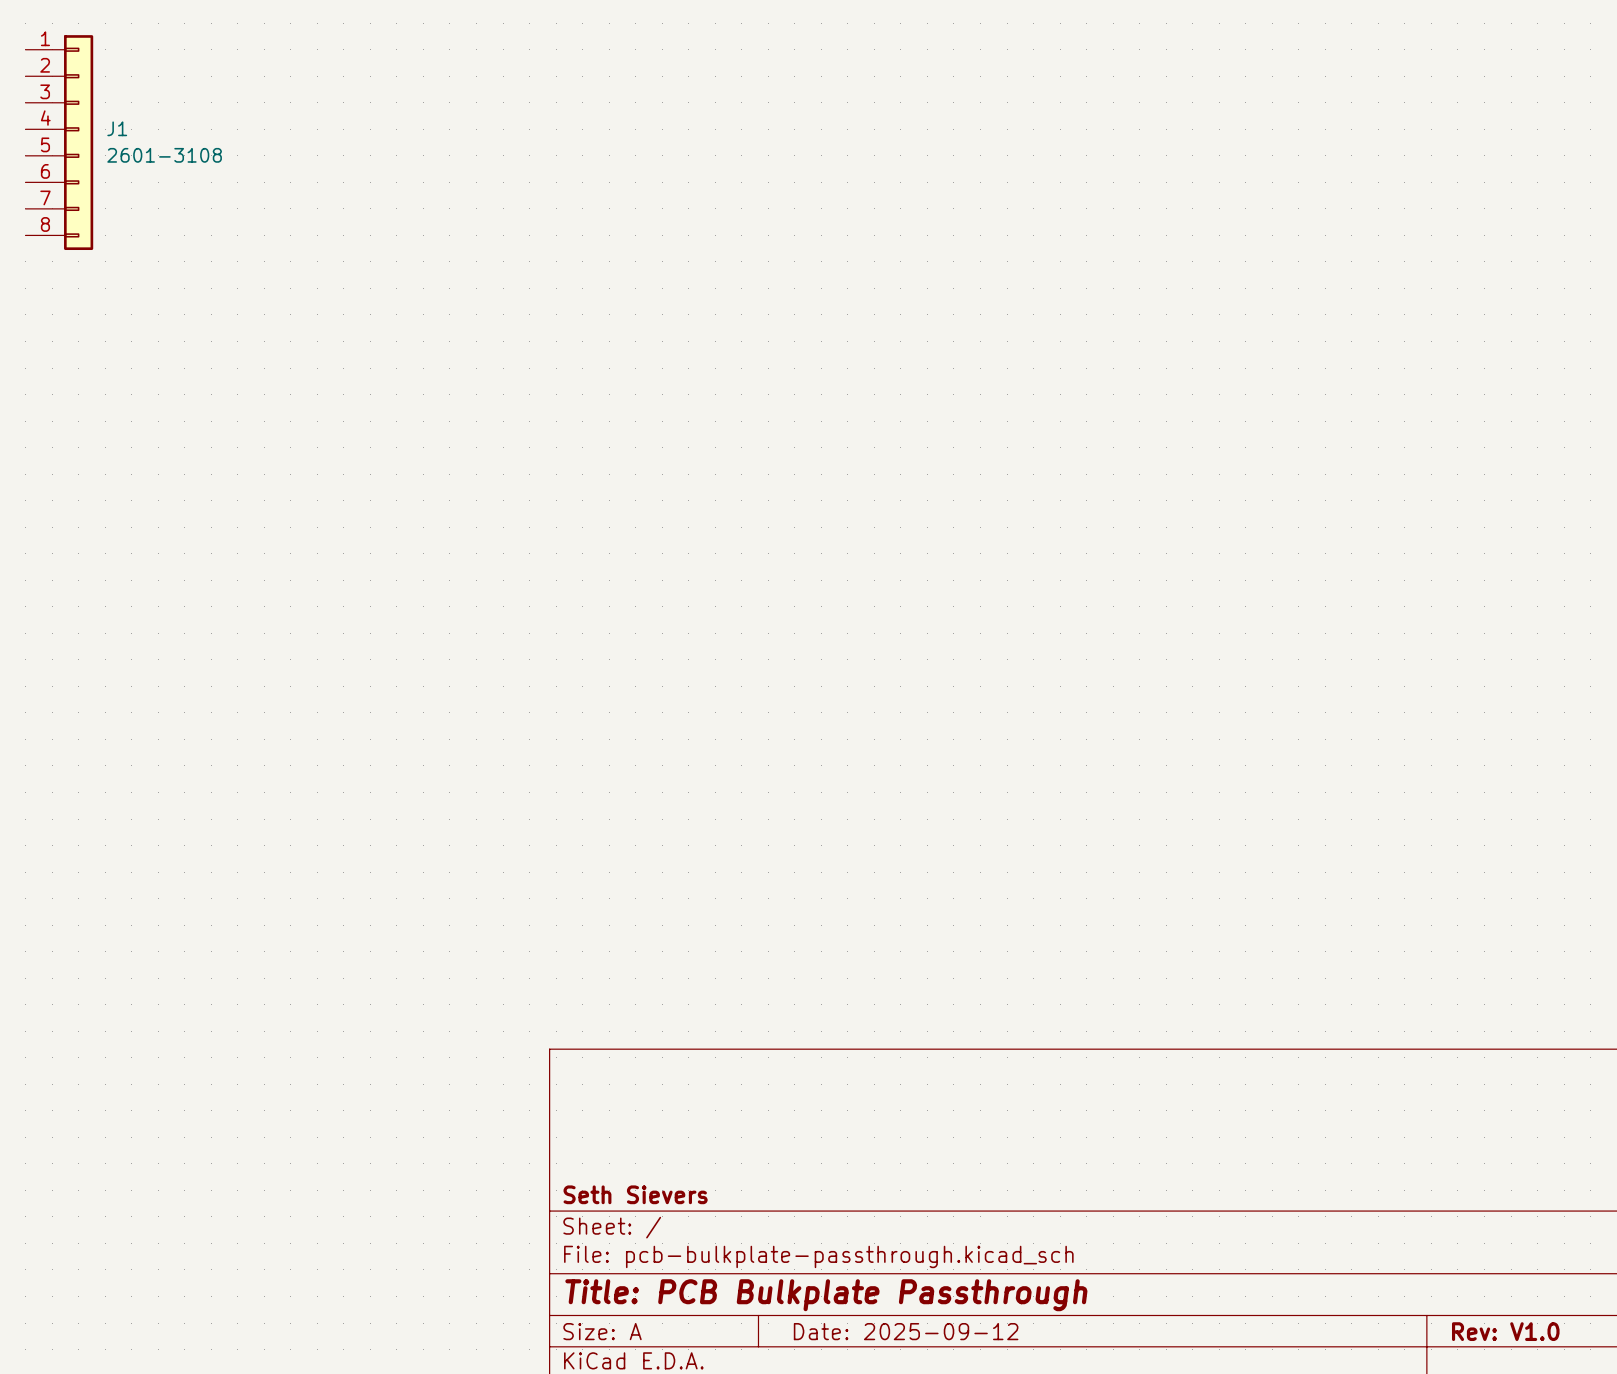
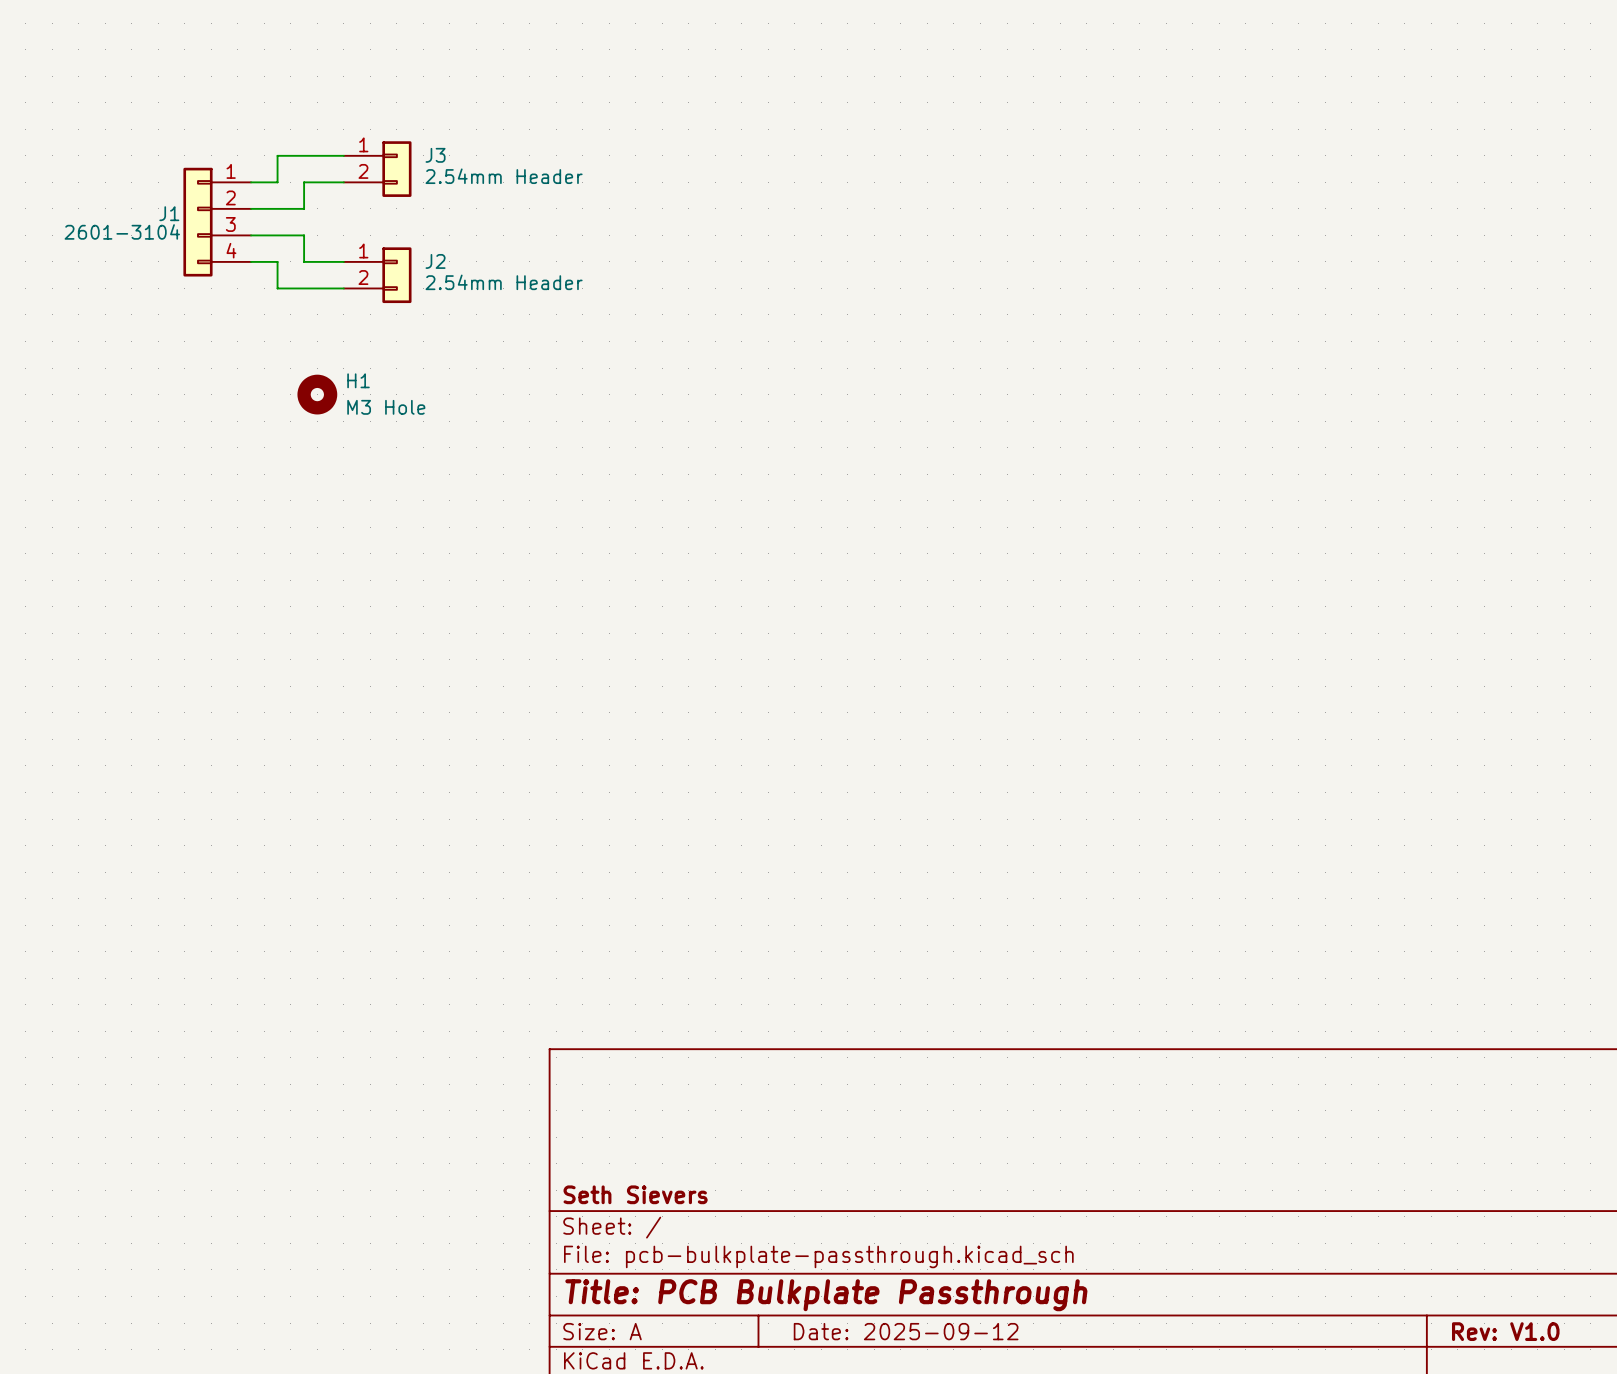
J1 symbol: [25, 35, 94, 251] -> [183, 167, 252, 277]
J1 name position: J1 (117, 128) -> J1 (169, 213)
J1 value: 2601-3108 (164, 155) -> 2601-3104 (122, 231)
wire: none -> (343, 155) (277, 155) (277, 182) (251, 182)
J3: none -> 2.54mm Header (377, 169)
wire: none -> (343, 182) (304, 182) (304, 208) (251, 208)
wire: none -> (251, 235) (304, 235) (304, 261) (343, 261)
wire: none -> (251, 261) (277, 261) (277, 288) (343, 288)
J2: none -> 2.54mm Header (377, 275)
H1: none -> M3 Hole (317, 394)

